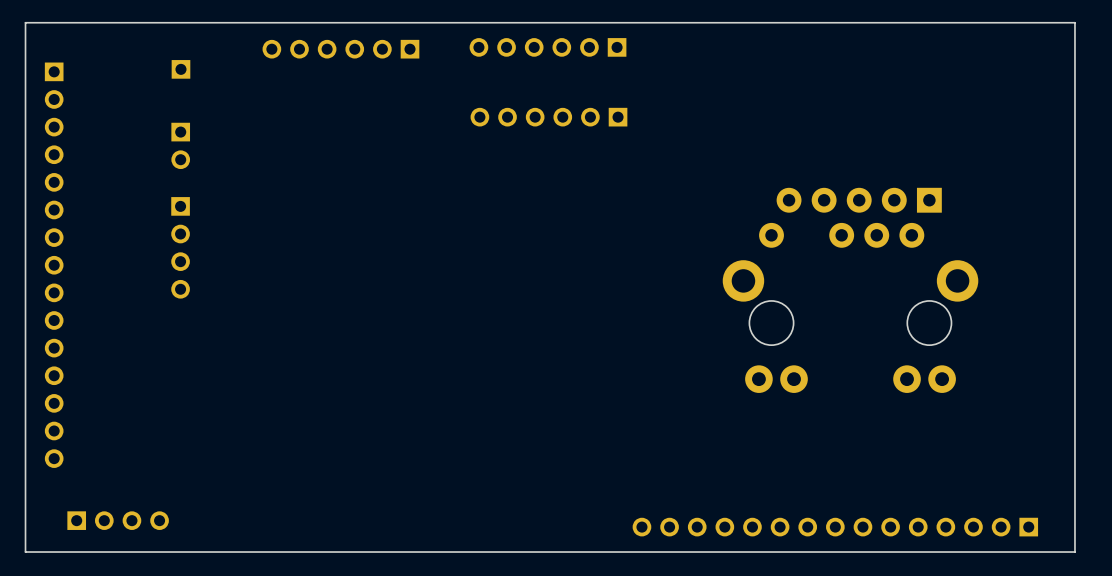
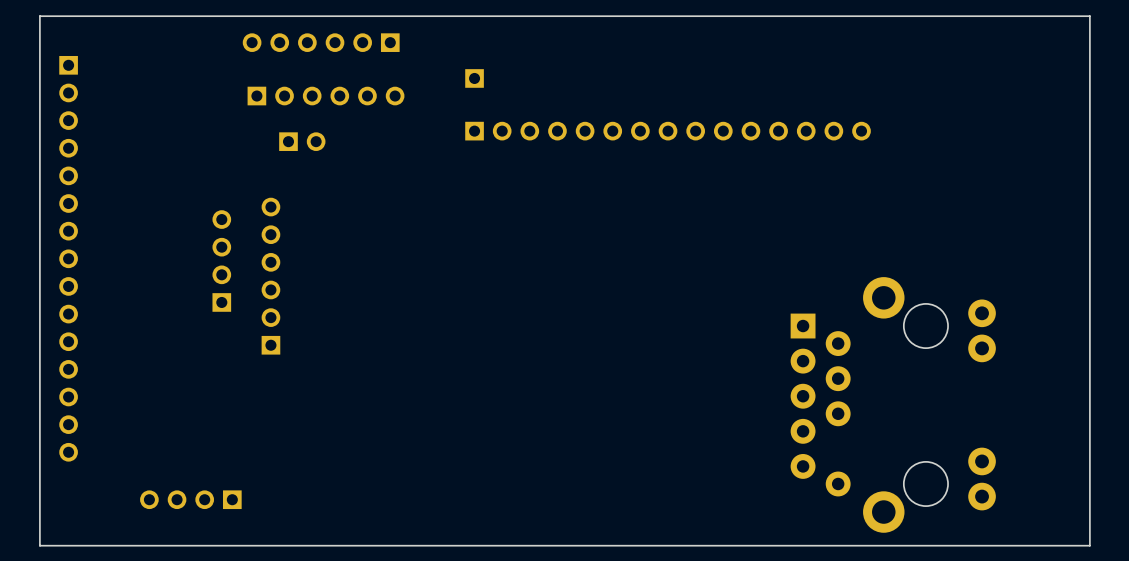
part: (548, 47) -> none
part: none -> (321, 42)
part: (340, 49) -> none
part position: (180, 69) -> (474, 78)
part: none -> (326, 96)
part: (548, 117) -> none
part: none -> (668, 131)
part rotation: 0° (180, 145) -> 90° counterclockwise (302, 141)
part position: (180, 145) -> (302, 141)
part rotation: 0° (180, 247) -> 180° (221, 261)
part: none -> (270, 276)
part rotation: 0° (850, 290) -> 90° counterclockwise (893, 404)
part rotation: 0° (118, 520) -> 180° (190, 499)
part: (835, 527) -> none

